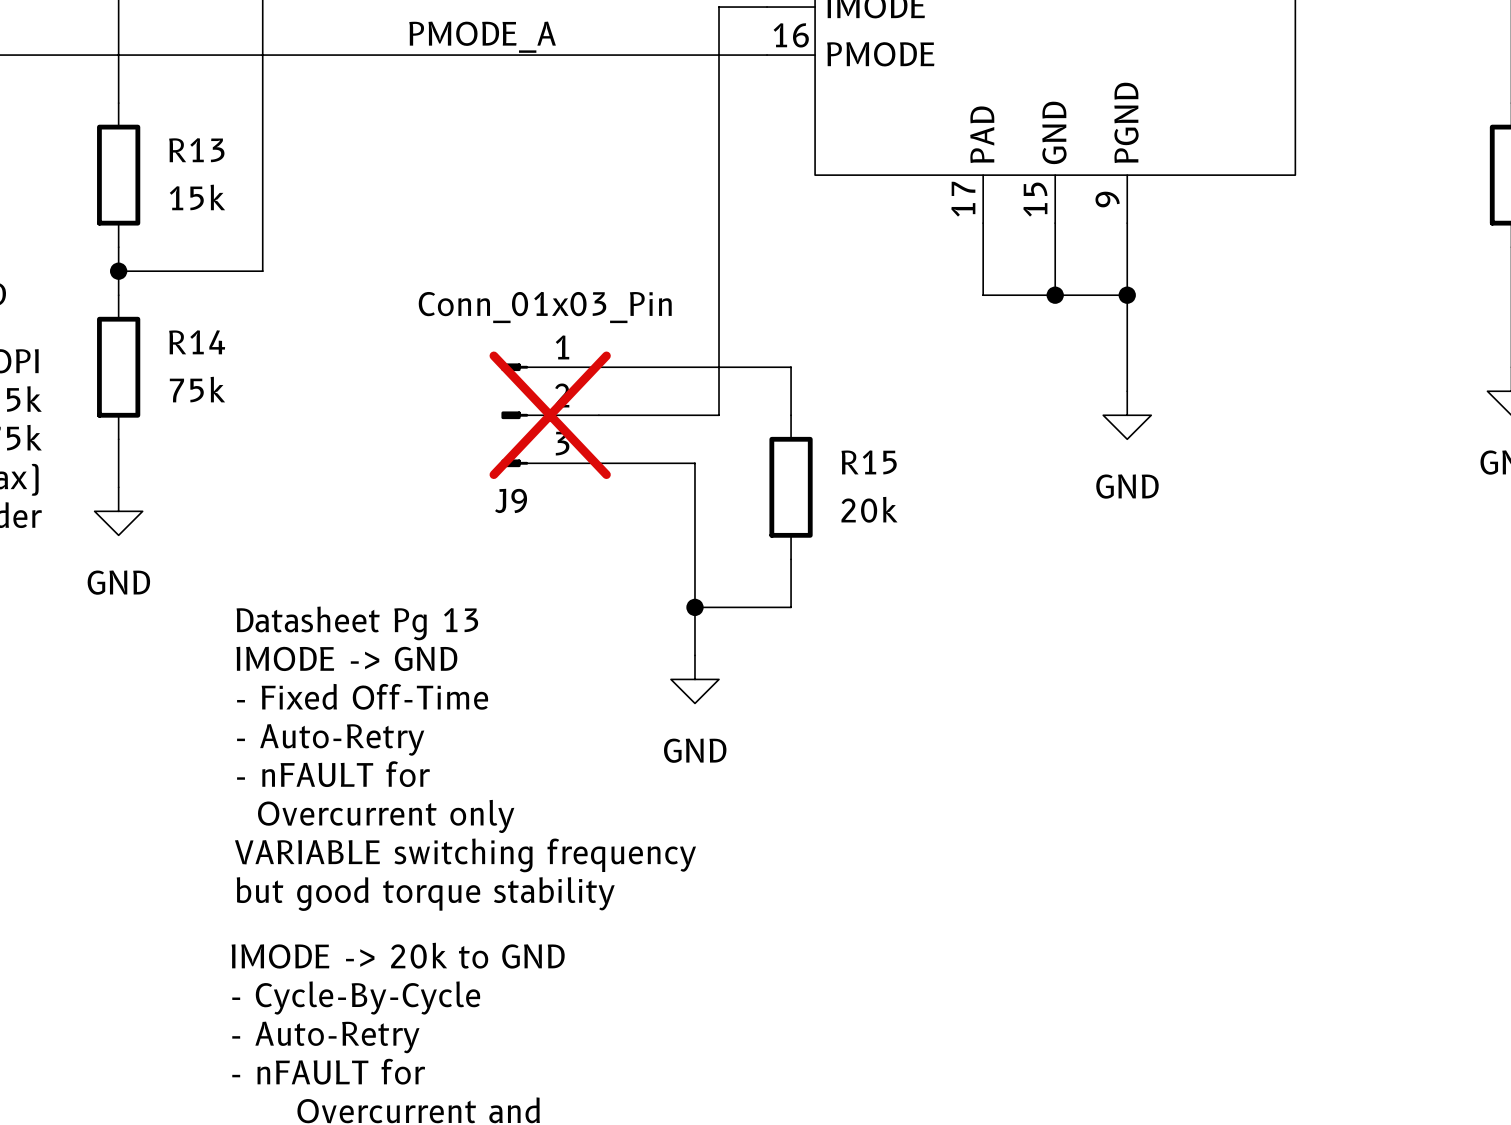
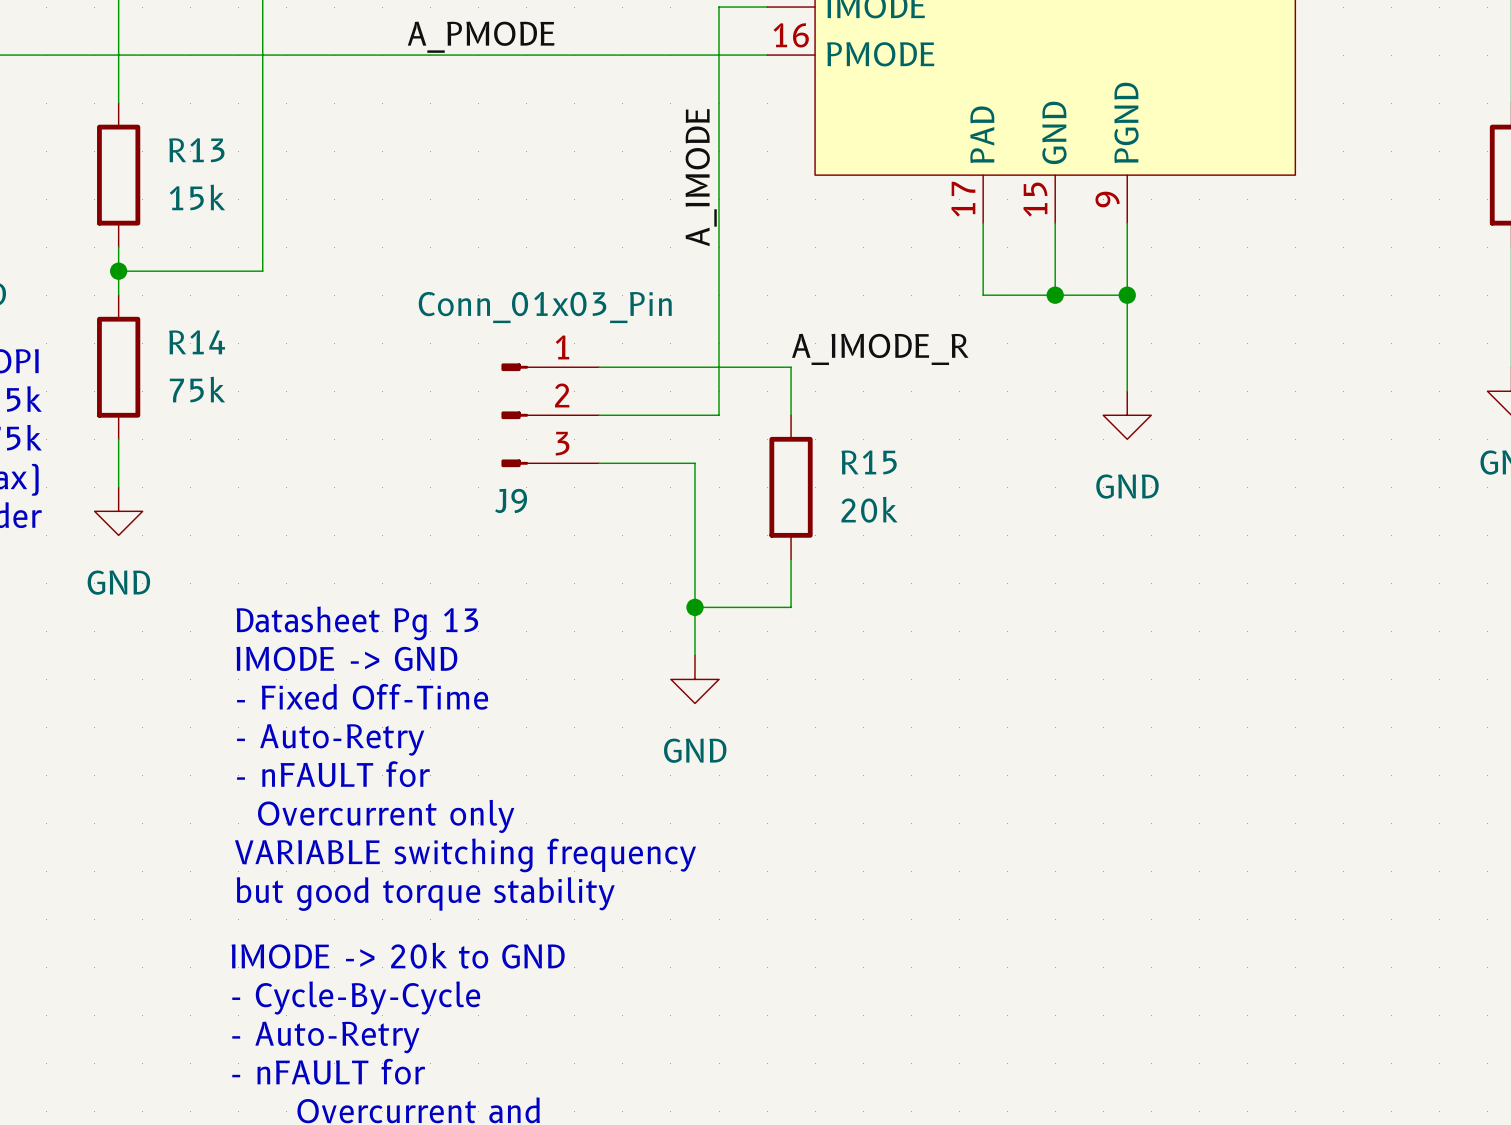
label: PMODE_A (482, 37) -> A_PMODE (481, 37)
label: none -> A_IMODE (701, 177)
label: none -> A_IMODE_R (880, 349)
J9 do-not-place cross: (550, 415) -> none

